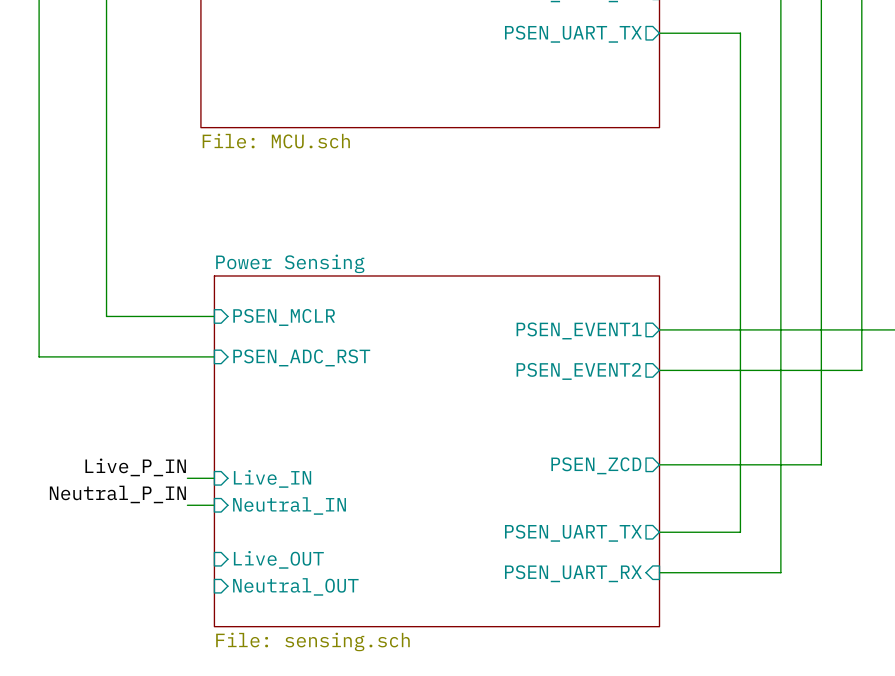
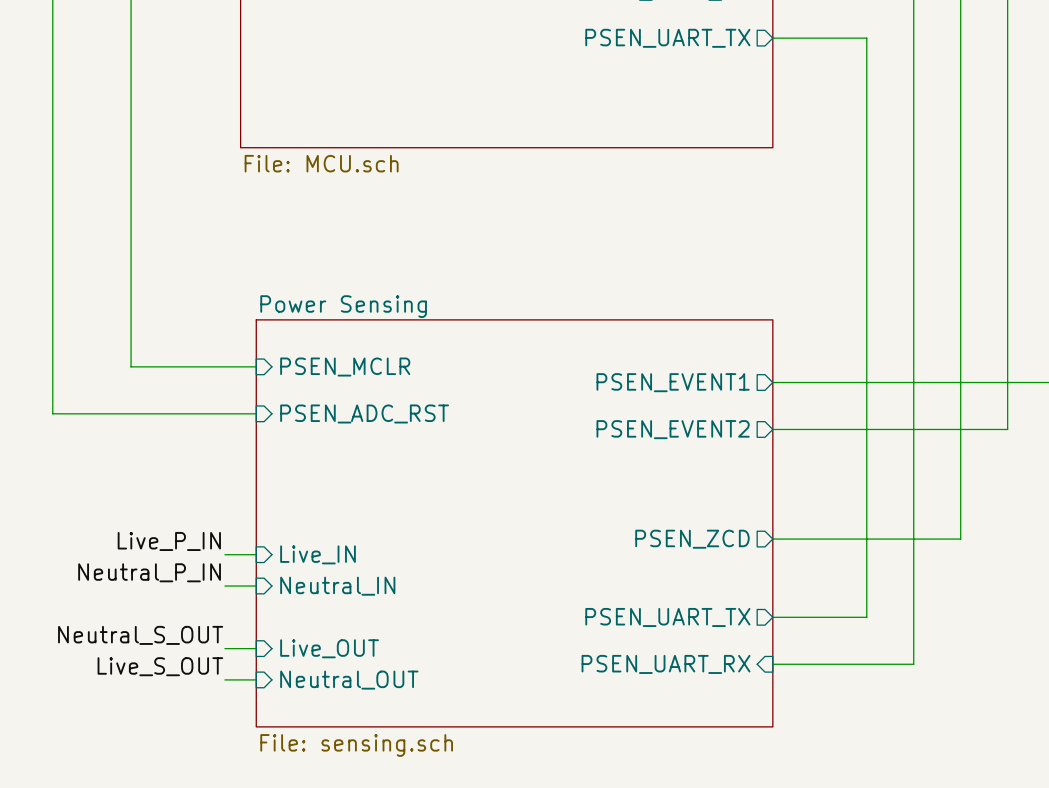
label: none -> Neutral_S_OUT (140, 635)
wire: none -> (224, 648) (256, 648)
label: none -> Live_S_OUT (160, 666)
wire: none -> (224, 679) (256, 679)

